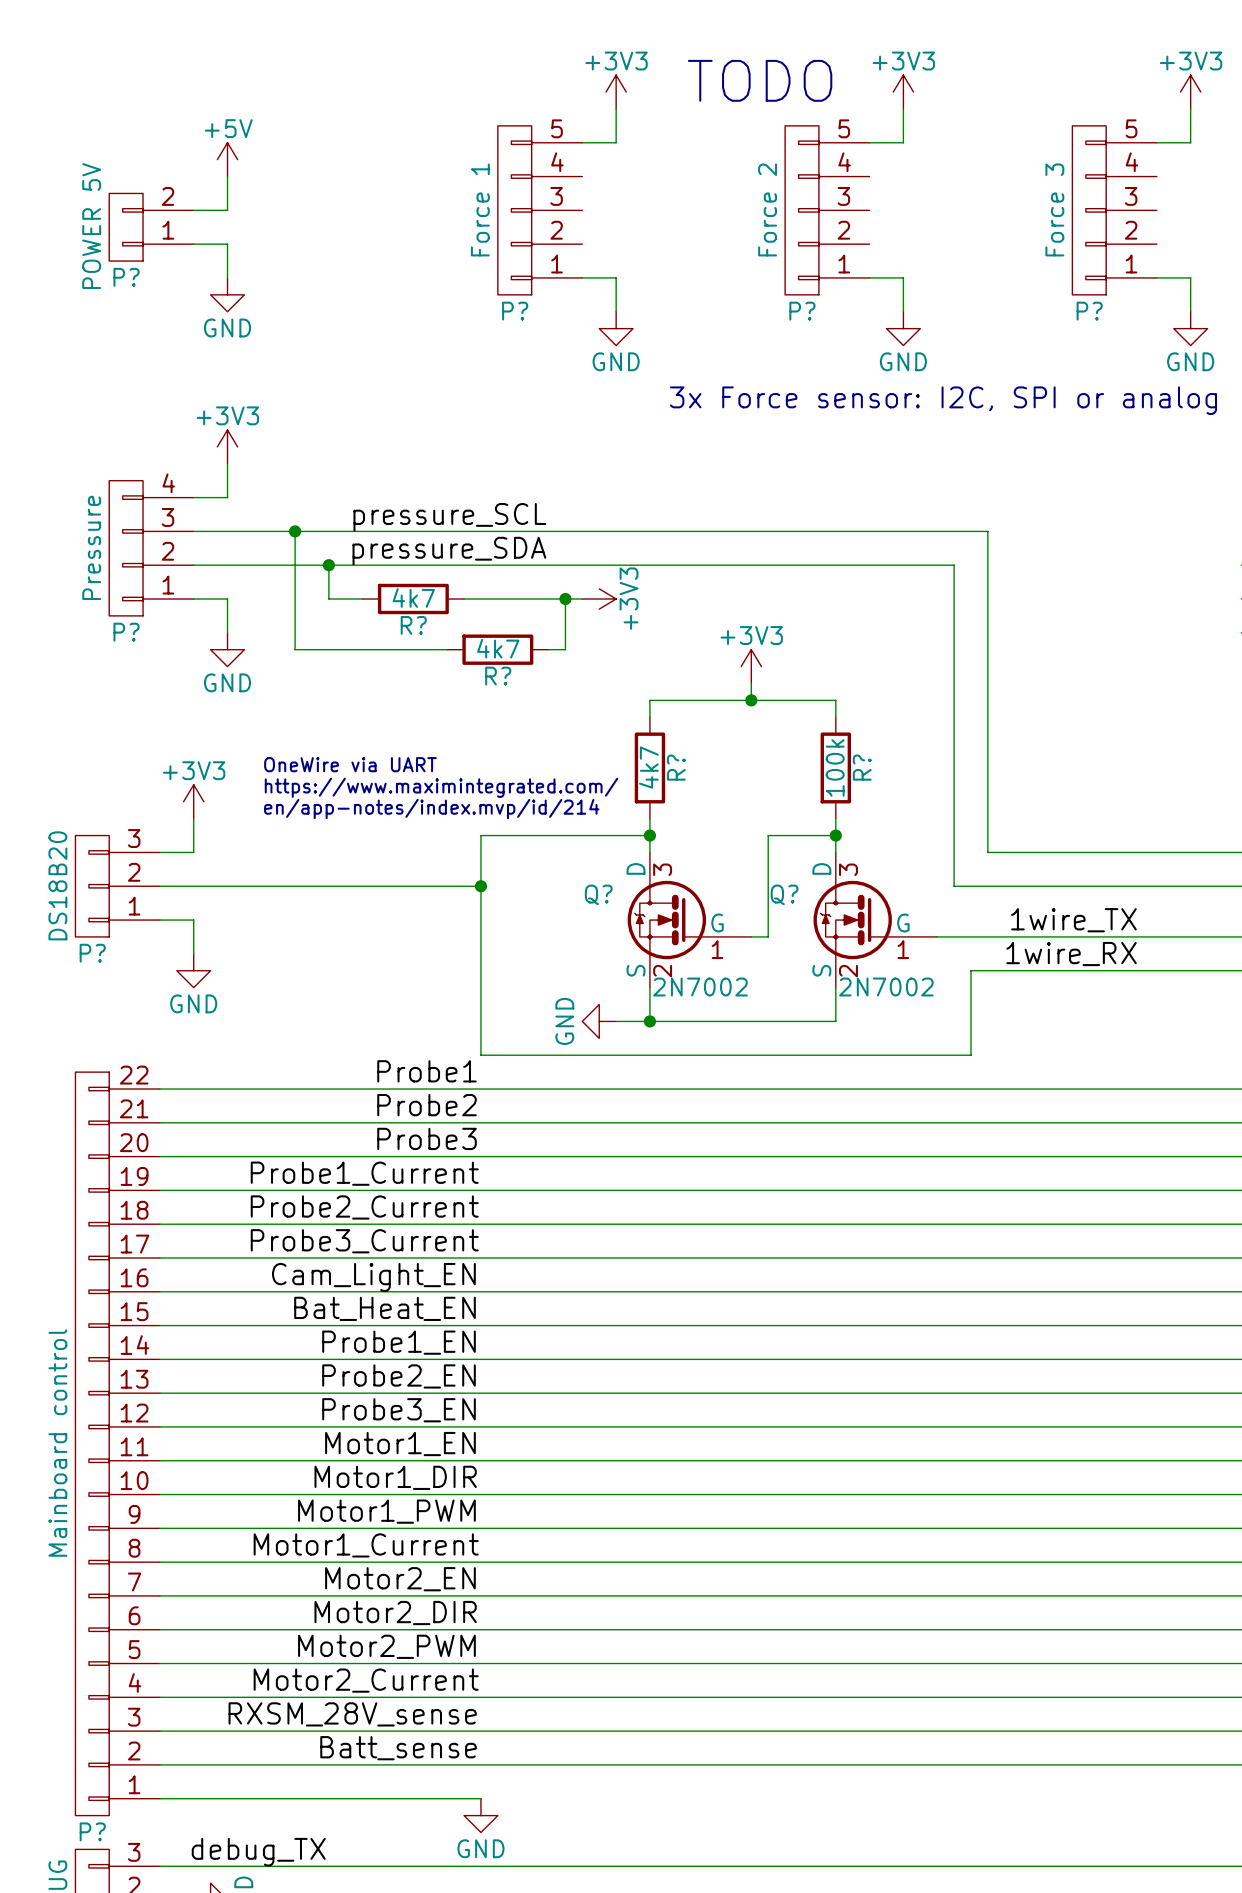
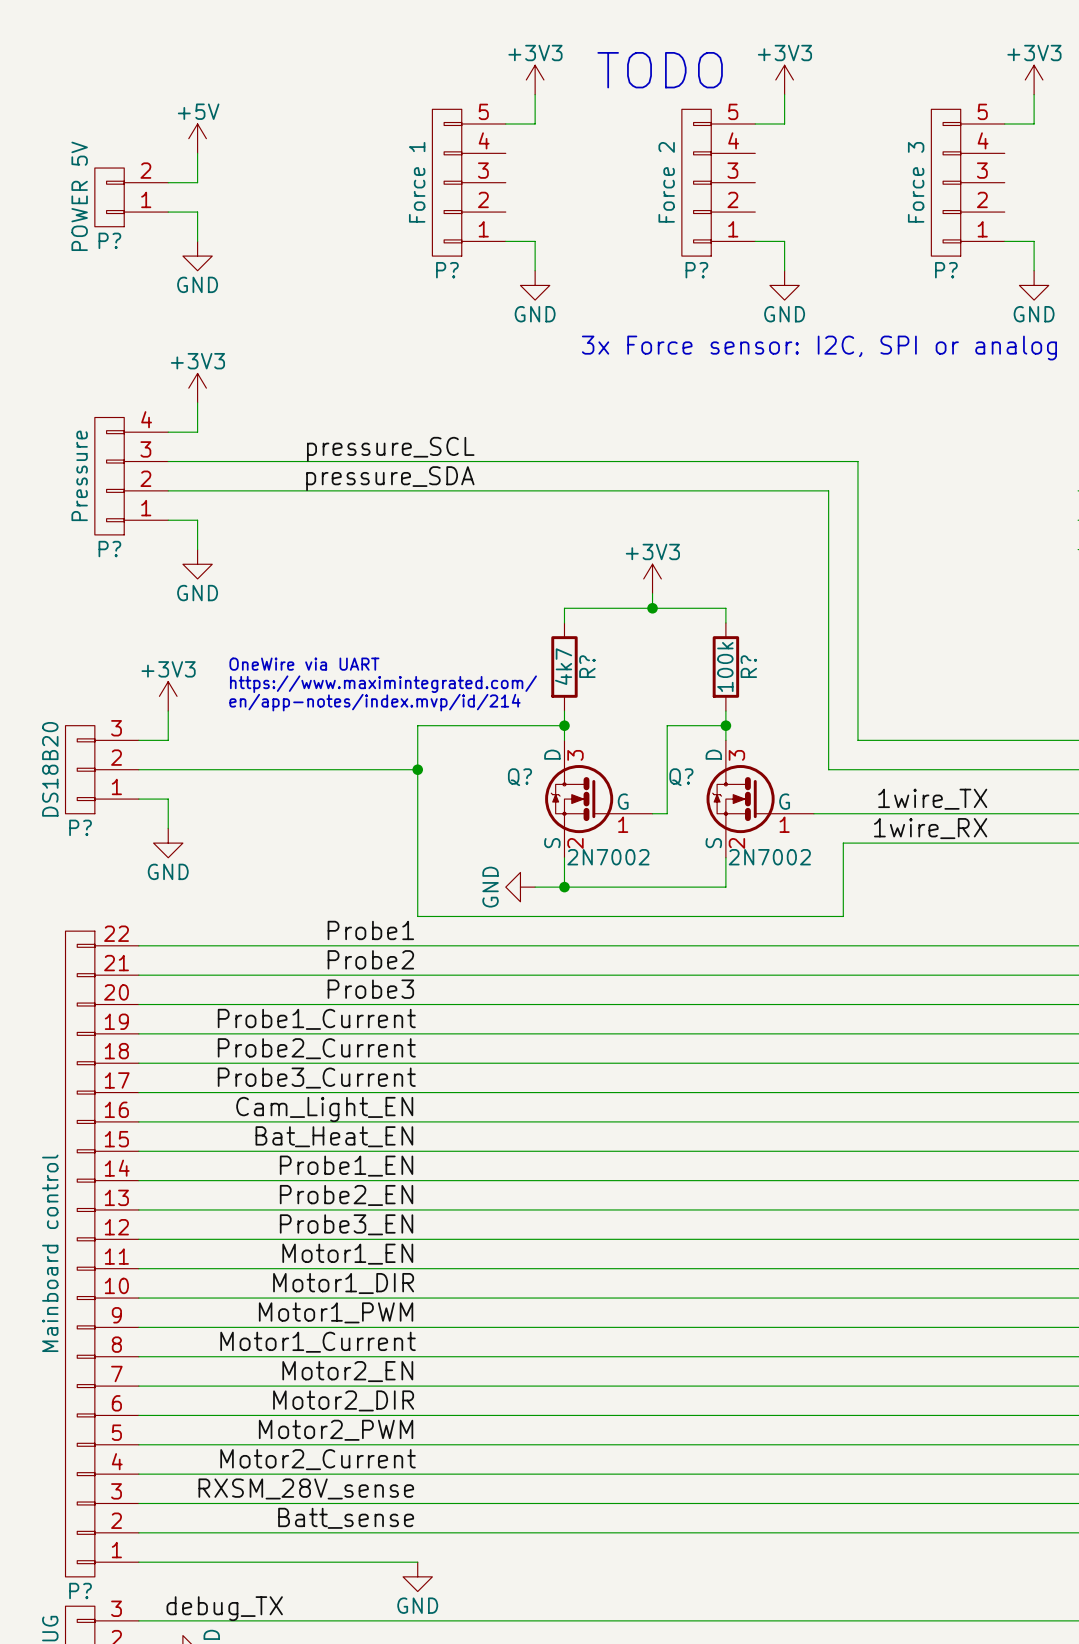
wire: (295, 531) (295, 649) (447, 649) -> none
junction: (295, 531) -> none
wire: (328, 565) (328, 598) (362, 598) -> none
junction: (328, 565) -> none
R?: 4k7 (413, 598) -> none
wire: (464, 598) (582, 598) -> none
wire: (565, 598) (565, 649) (548, 649) -> none
junction: (565, 598) -> none
power symbol: +3V3 (599, 598) -> none
R?: 4k7 (497, 649) -> none

